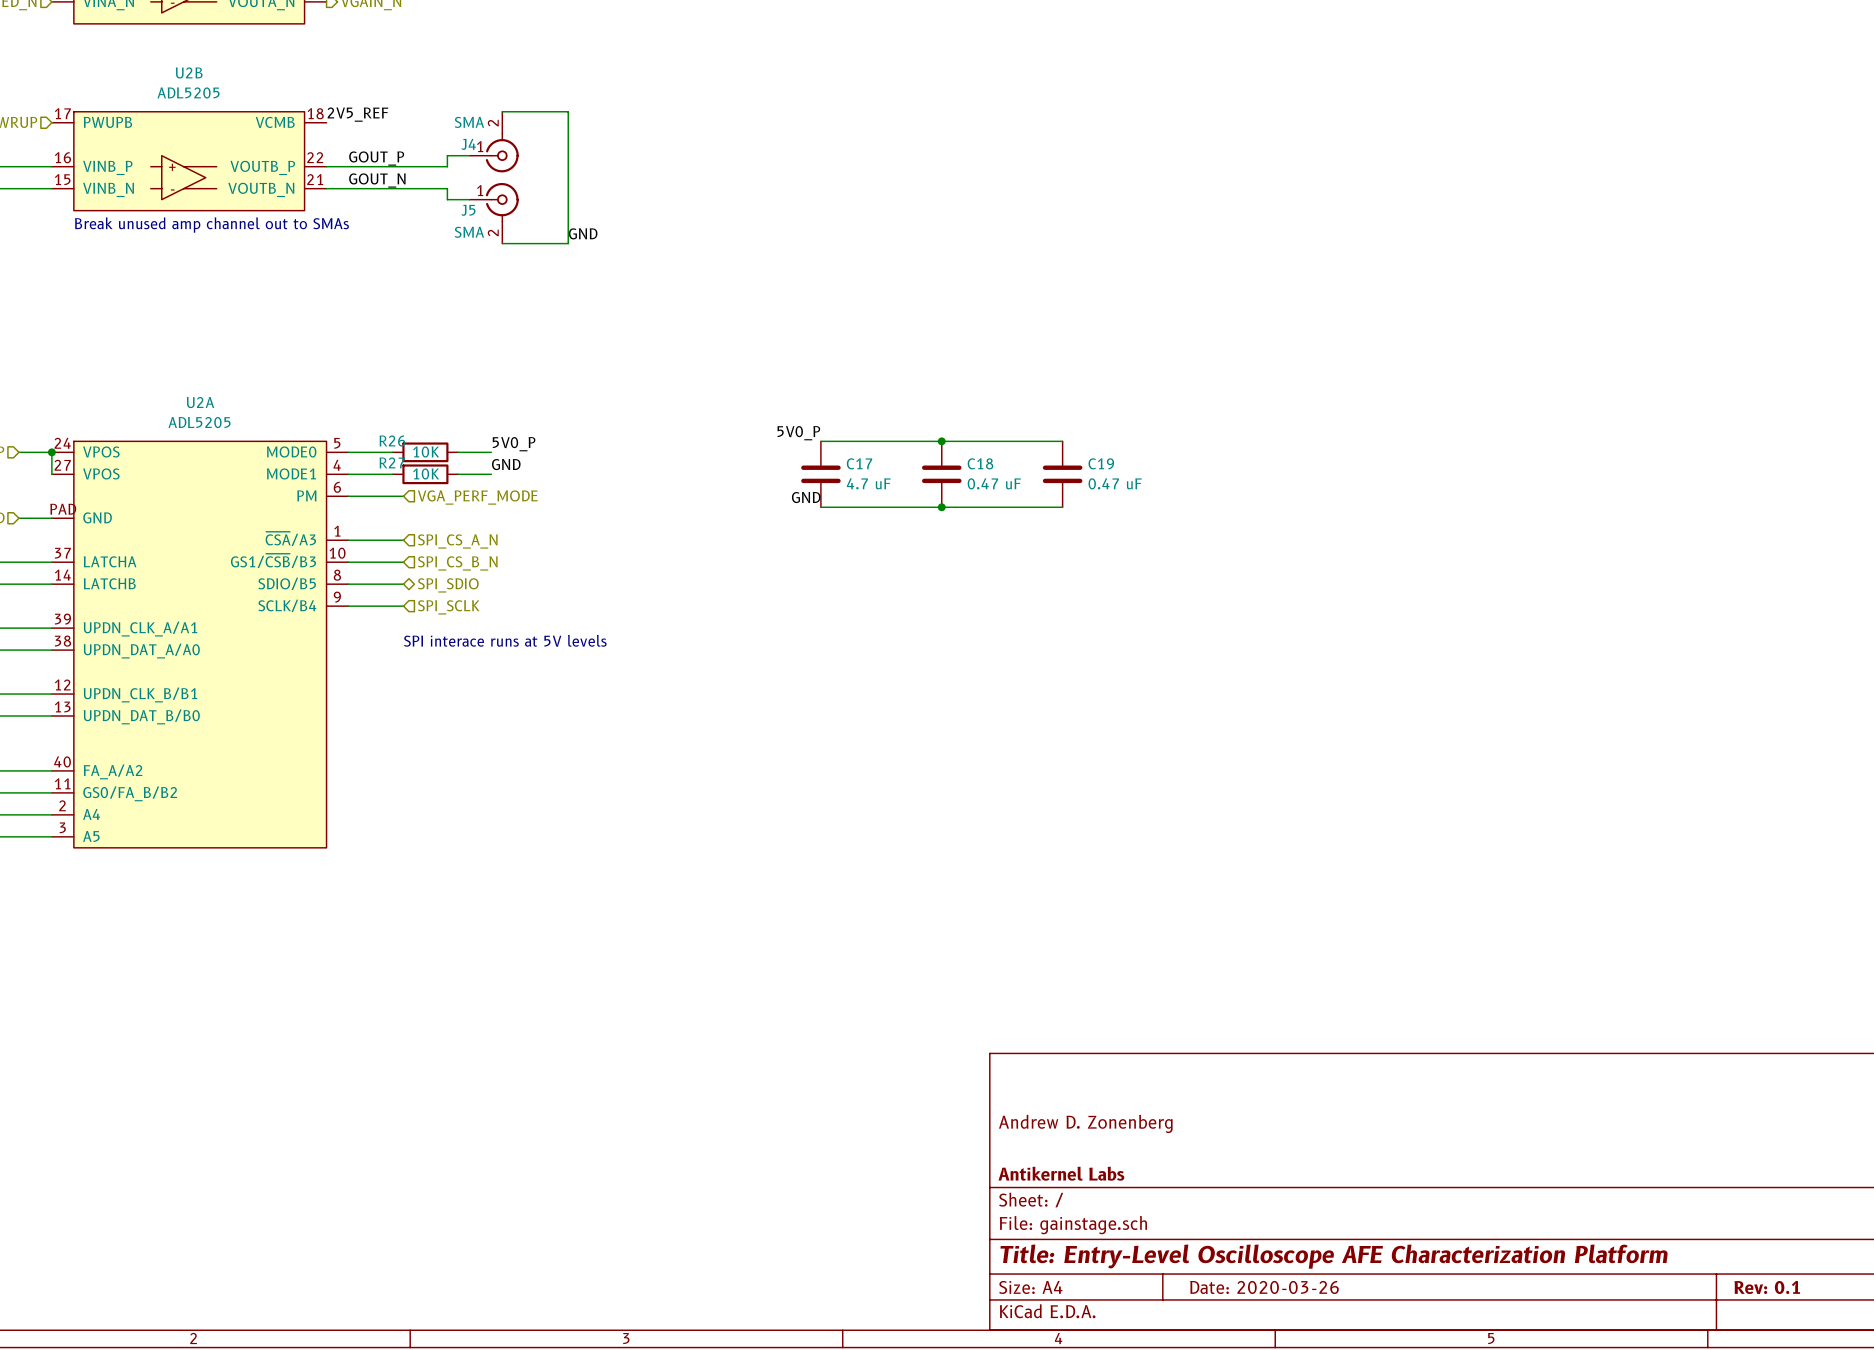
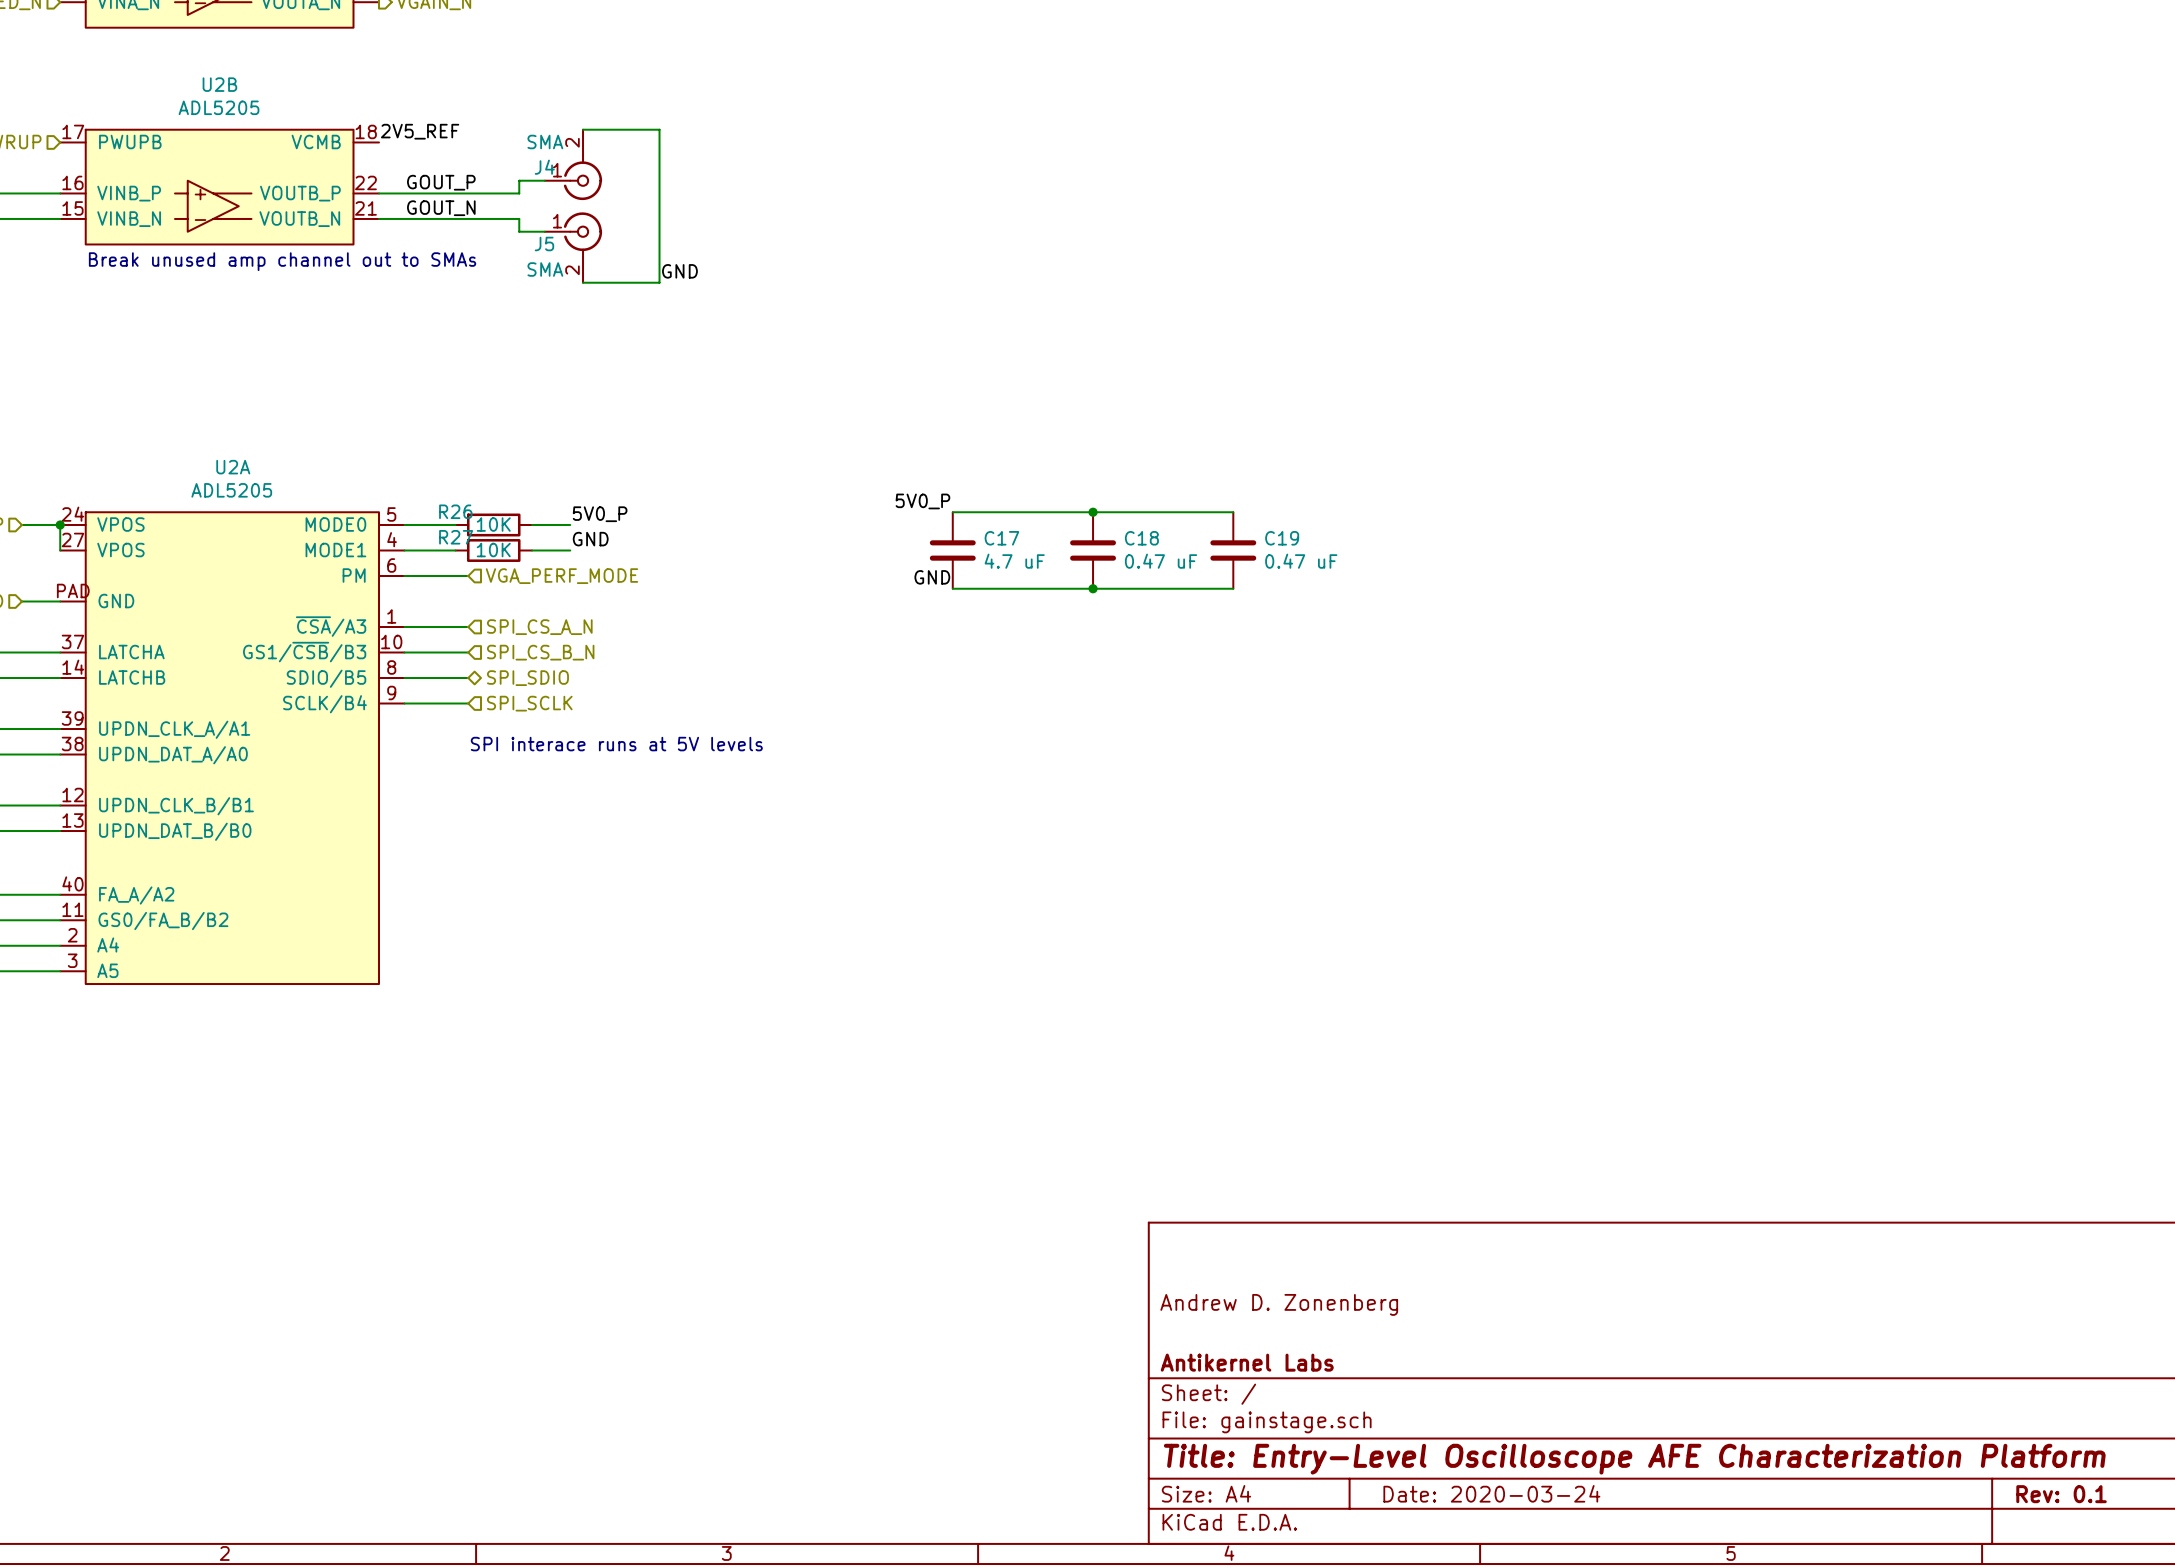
title block: Date: 2020-03-26 (1264, 1287) -> Date: 2020-03-24 (1491, 1493)

